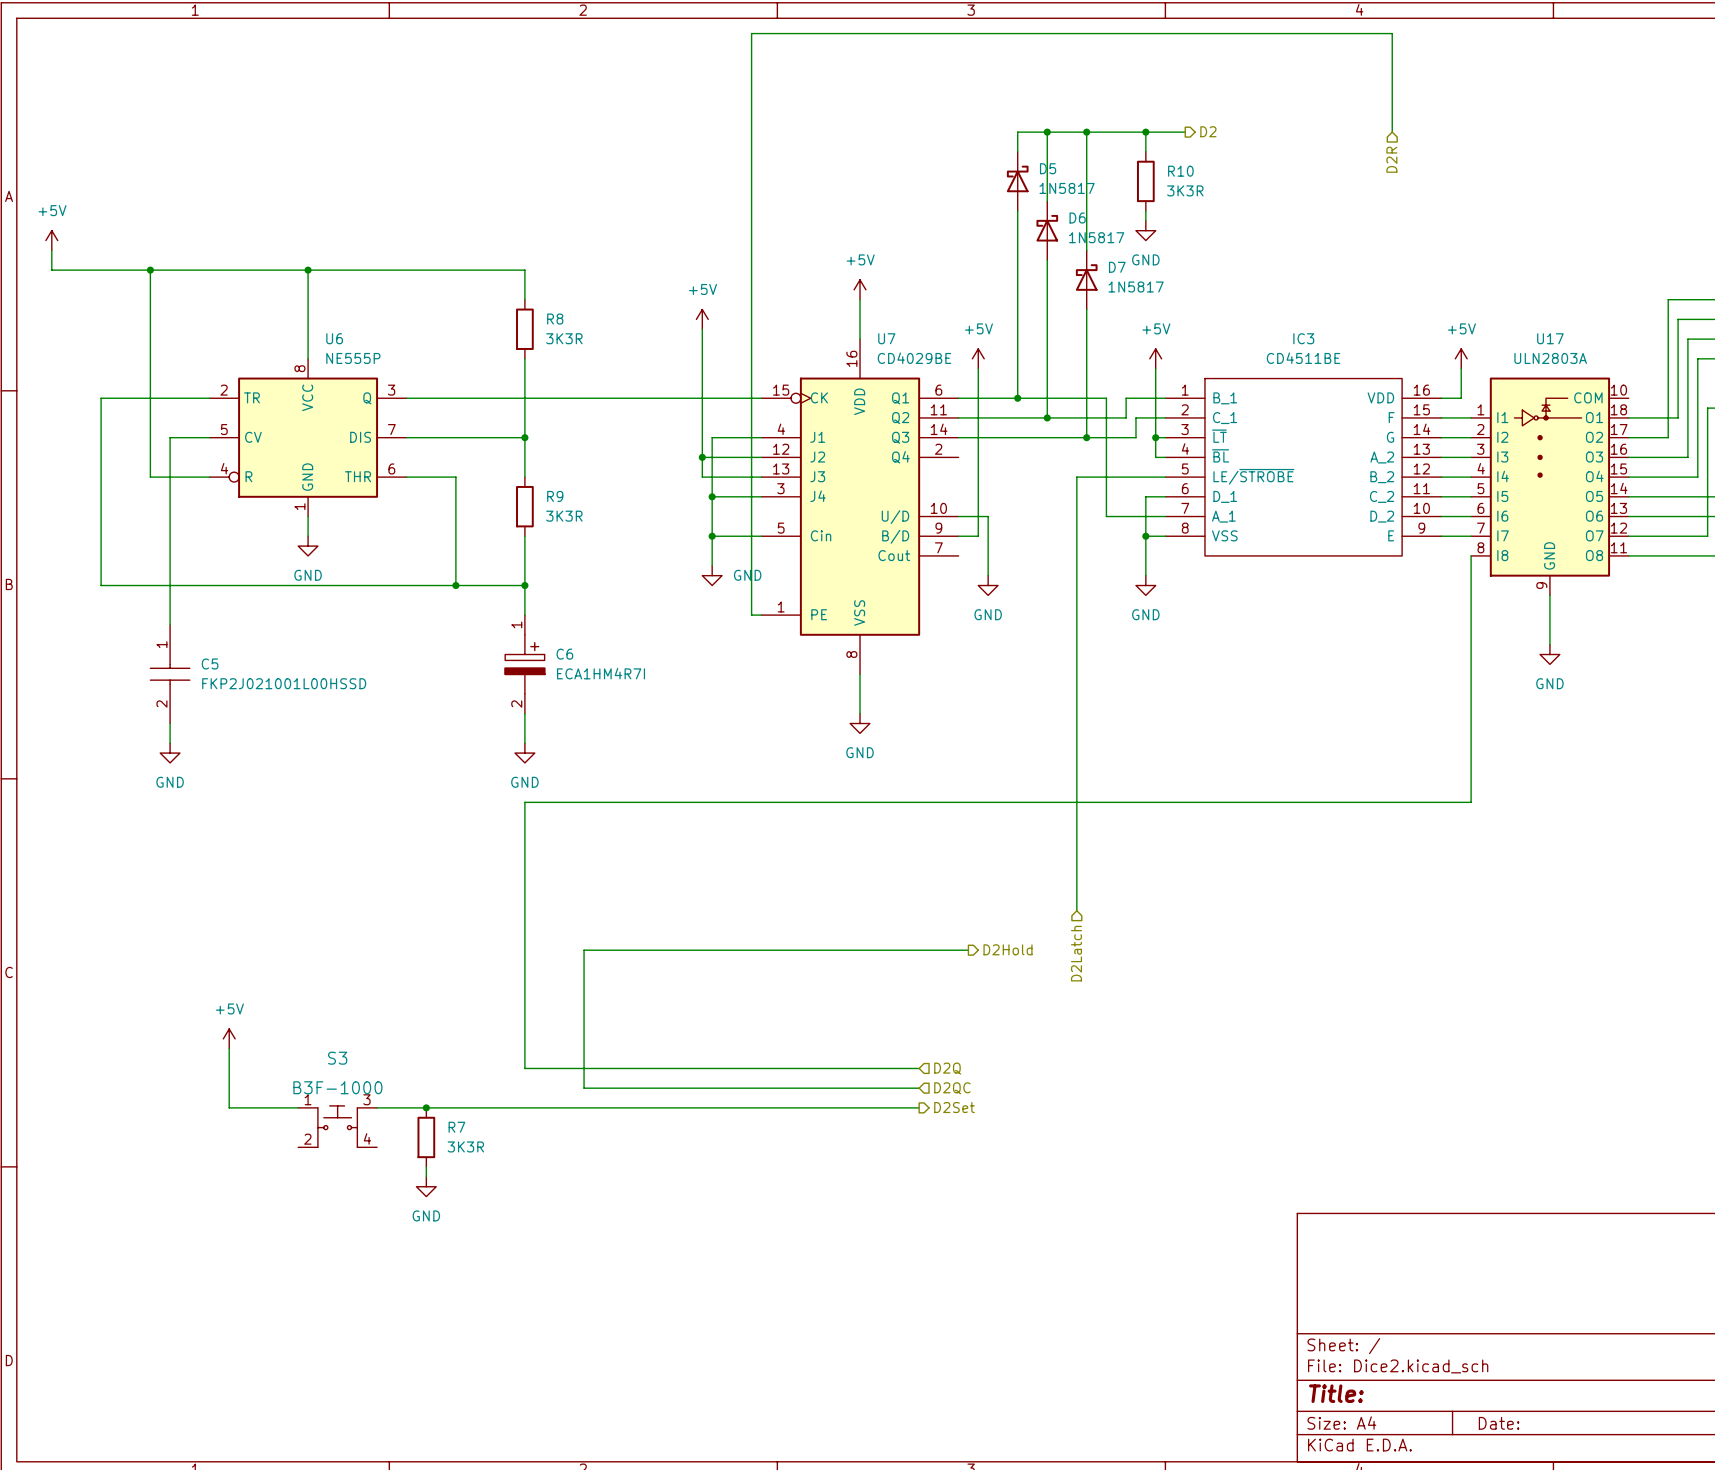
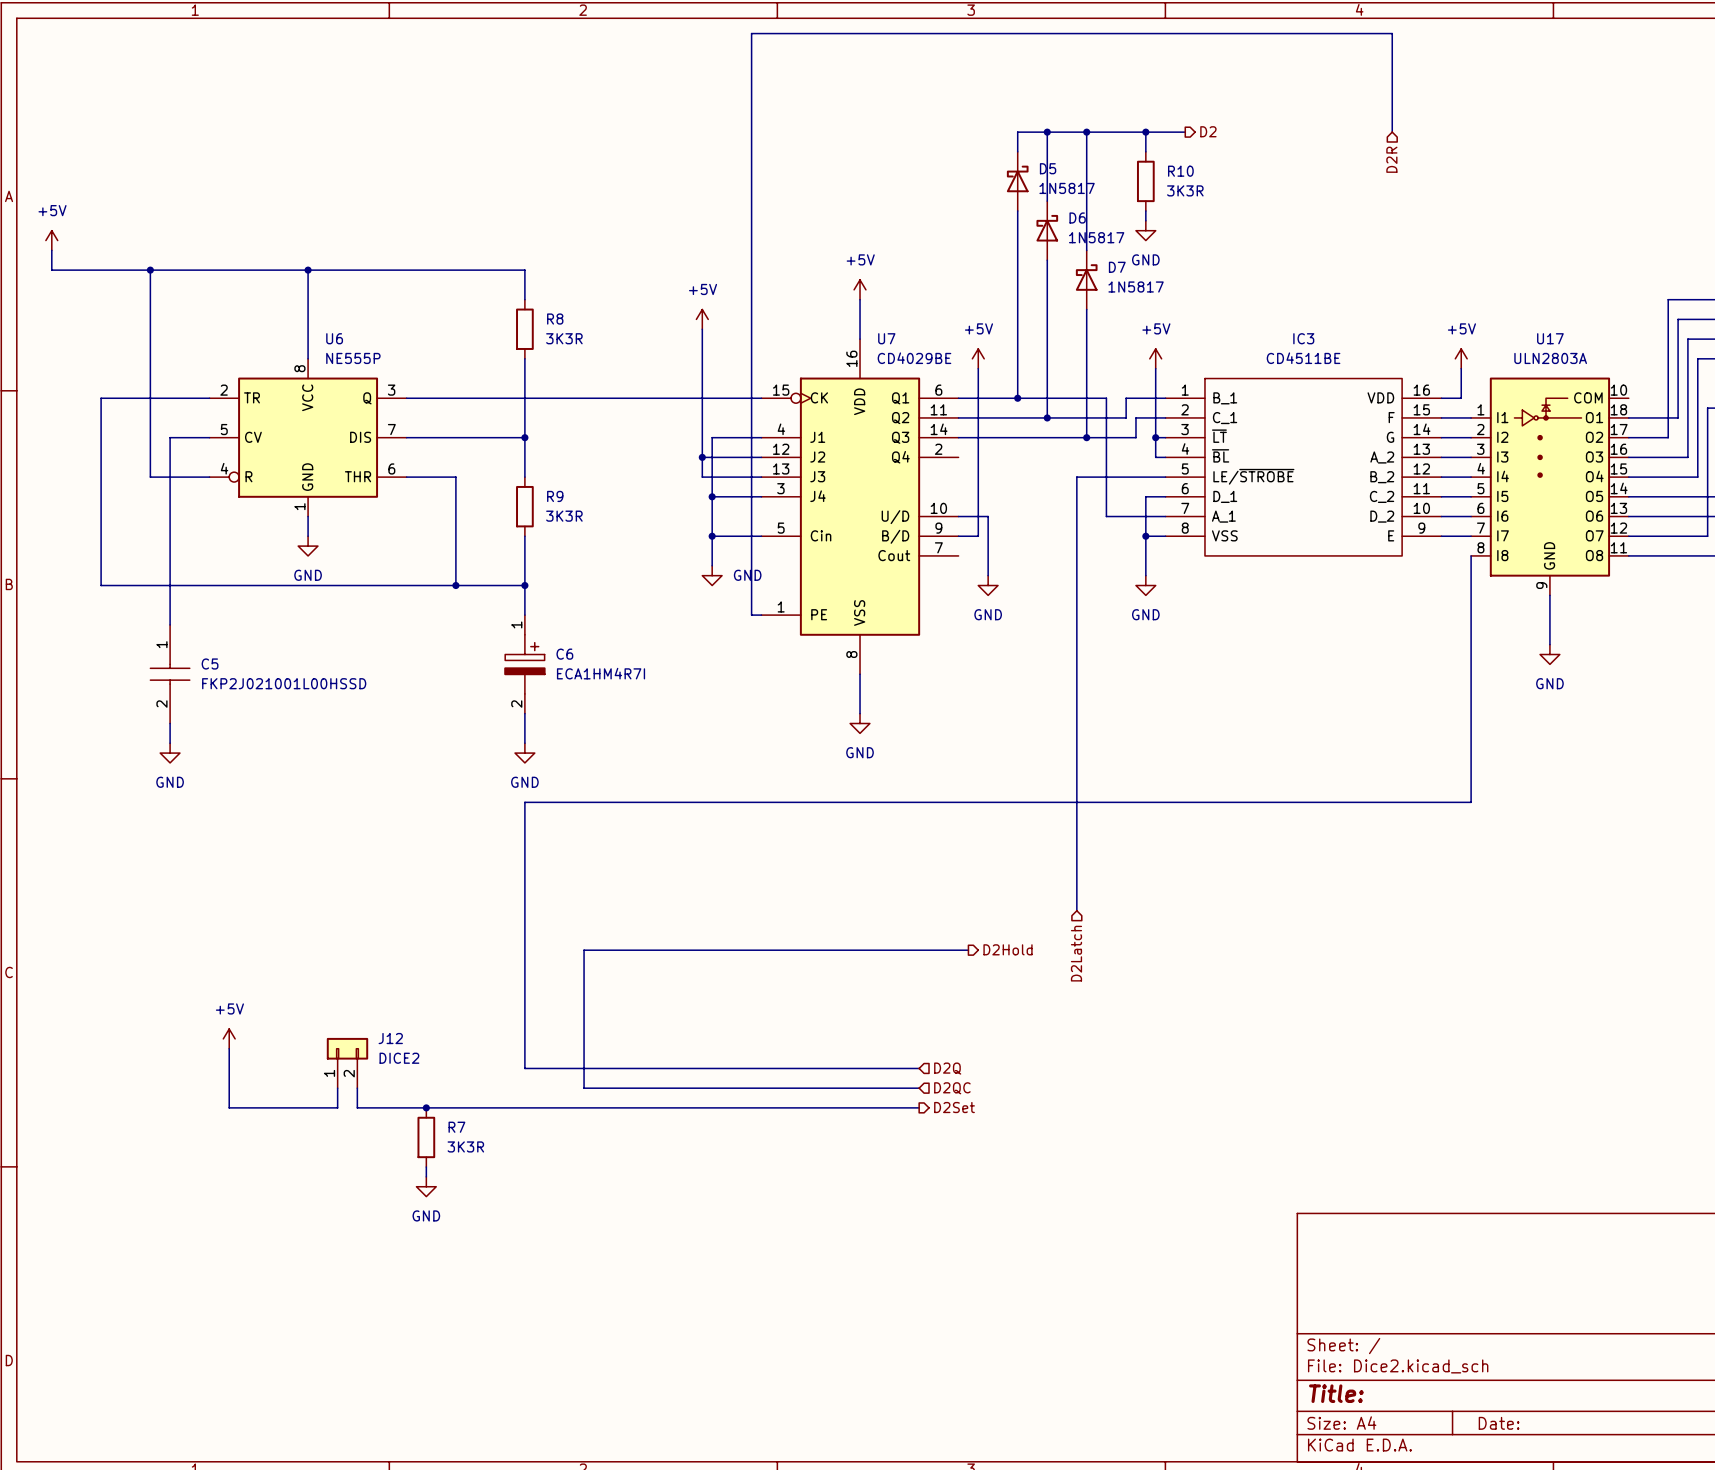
J12: none -> DICE2 (347, 1063)
wire: none -> (337, 1088) (337, 1107) (298, 1107)
wire: none -> (357, 1088) (357, 1107) (377, 1107)
S3: B3F-1000 (337, 1126) -> none

